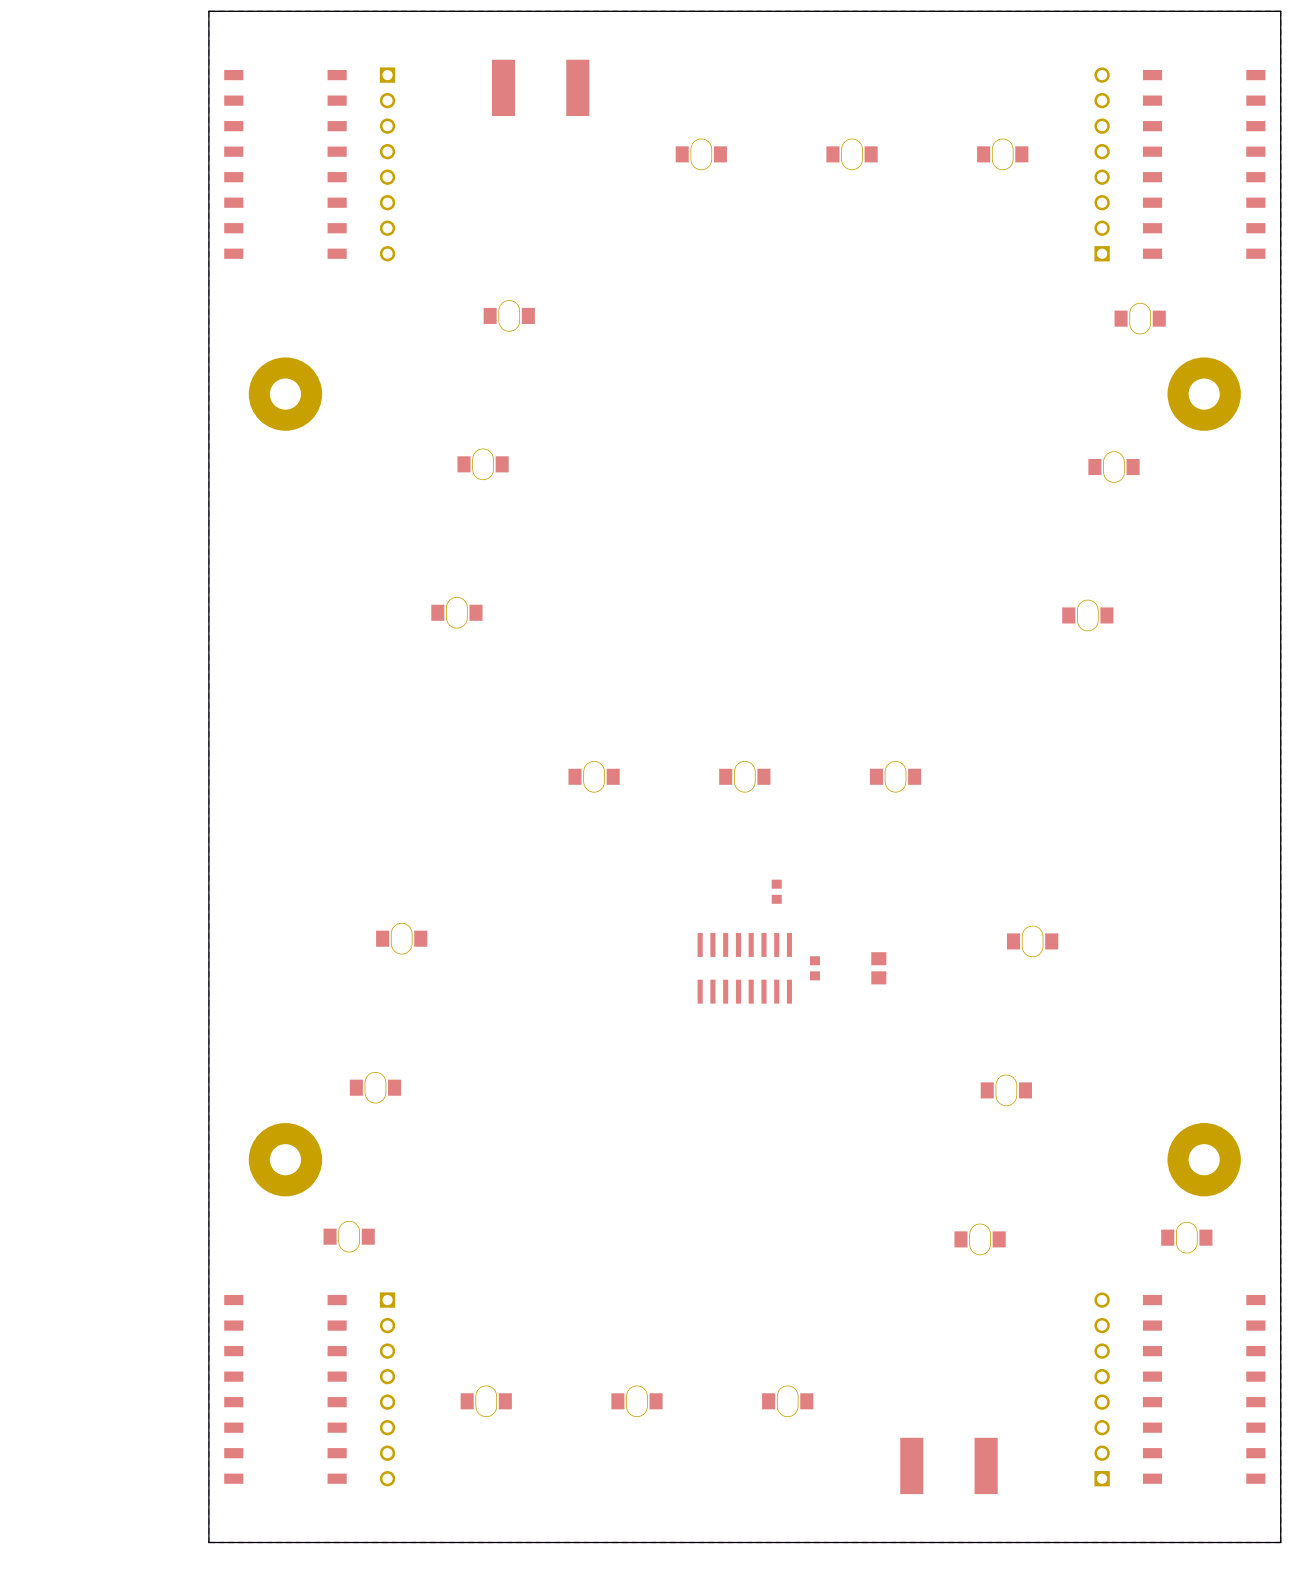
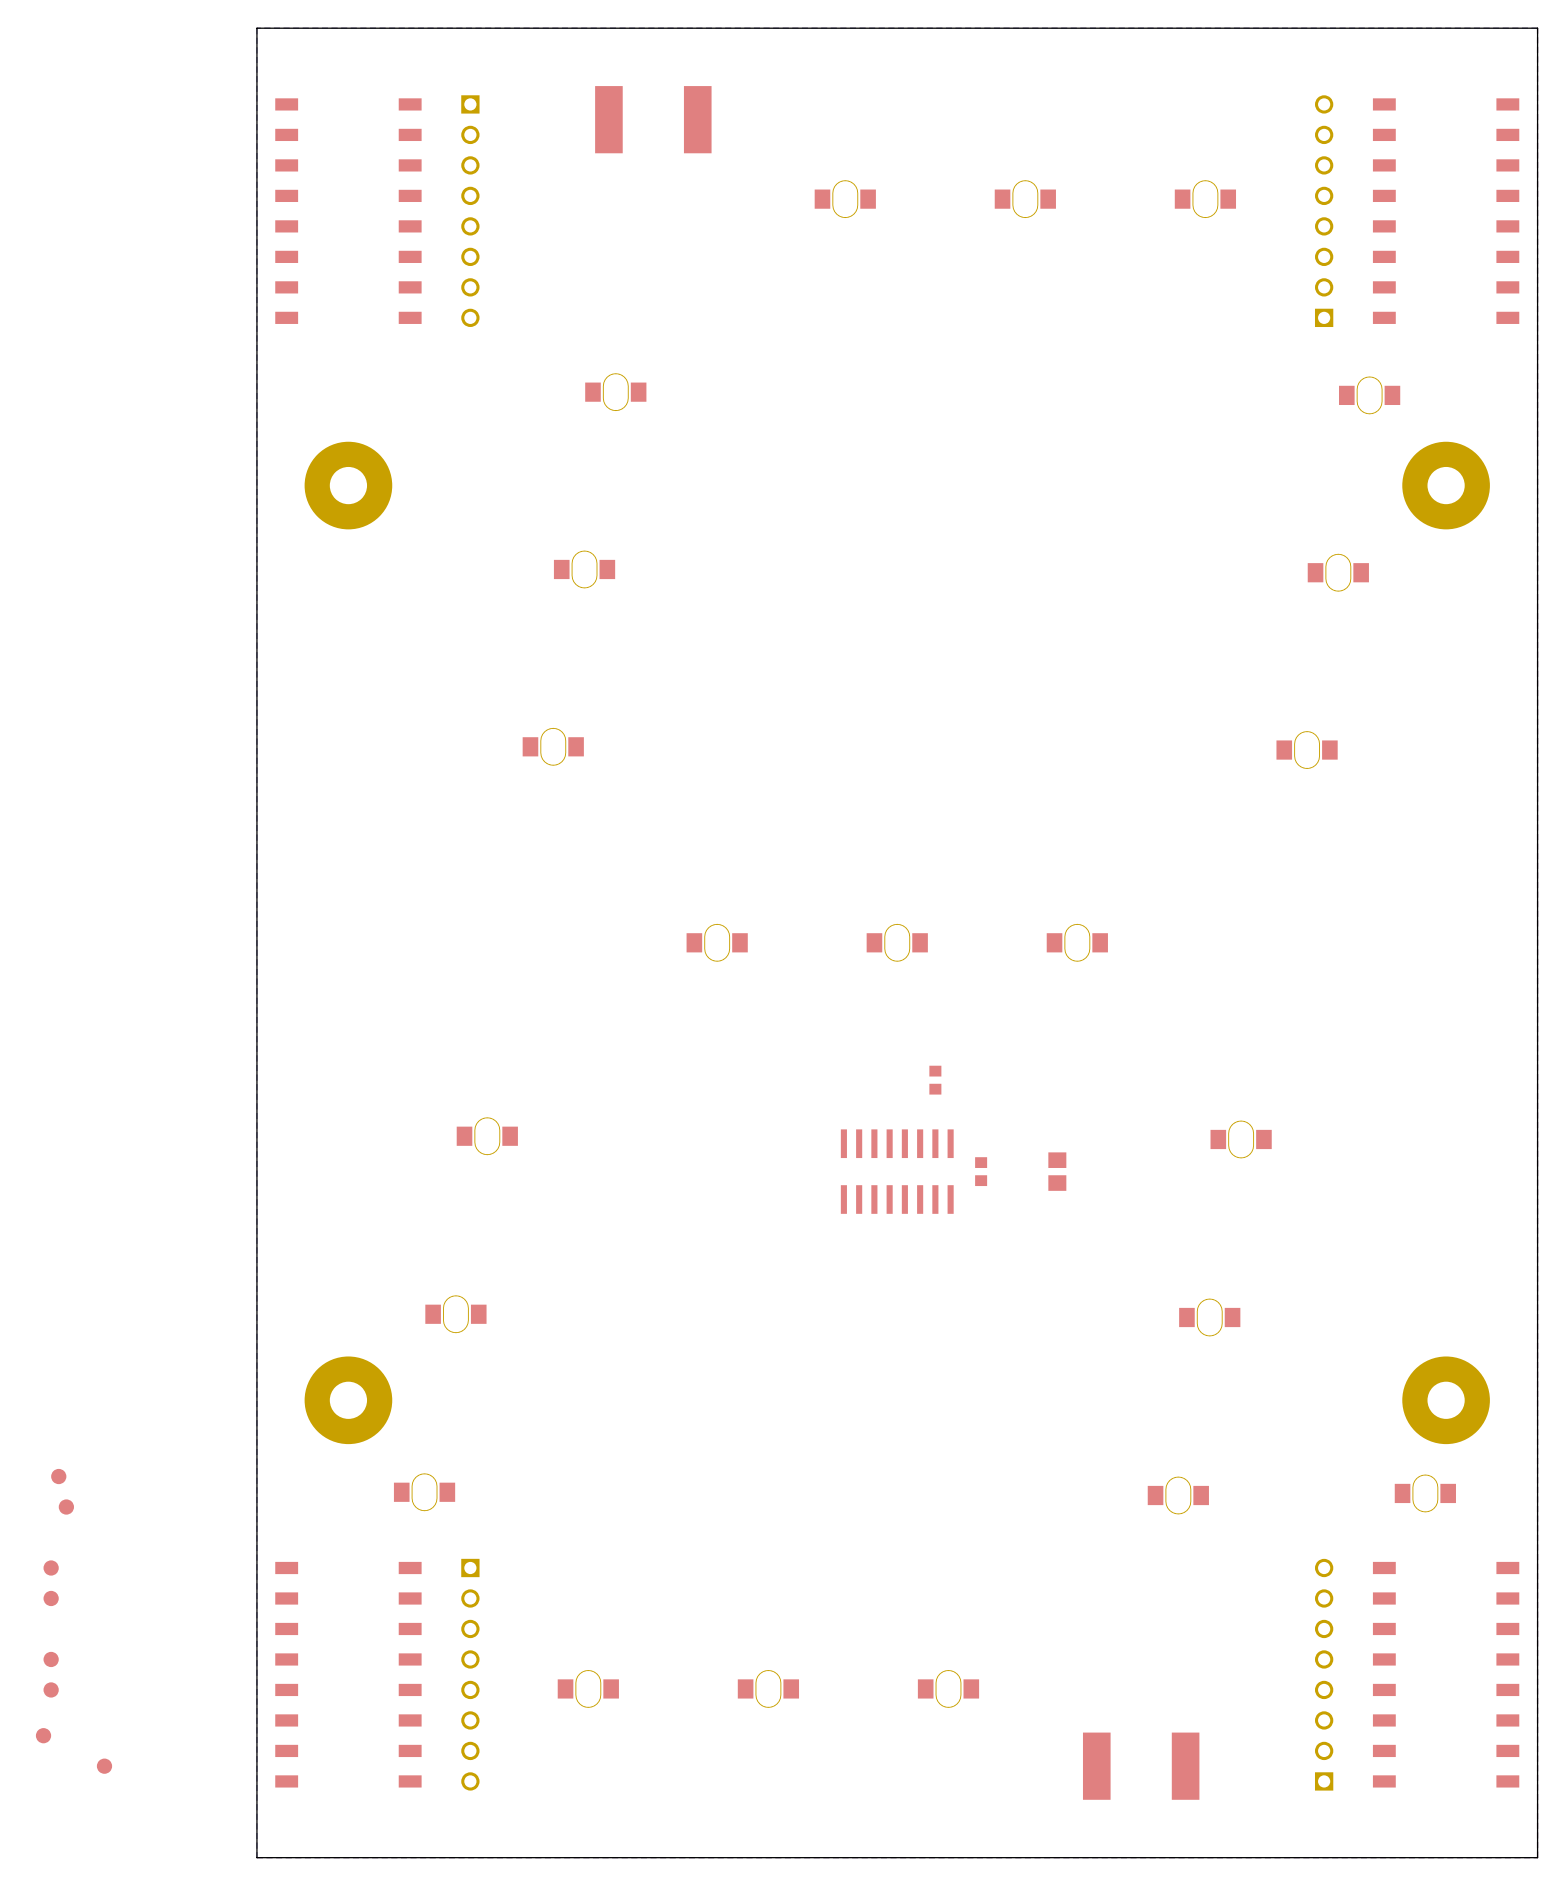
part: none -> (58, 1476)
part: none -> (66, 1507)
part: none -> (51, 1567)
part: none -> (51, 1598)
part: none -> (51, 1659)
part: none -> (51, 1689)
part: none -> (43, 1735)
part: none -> (104, 1766)

